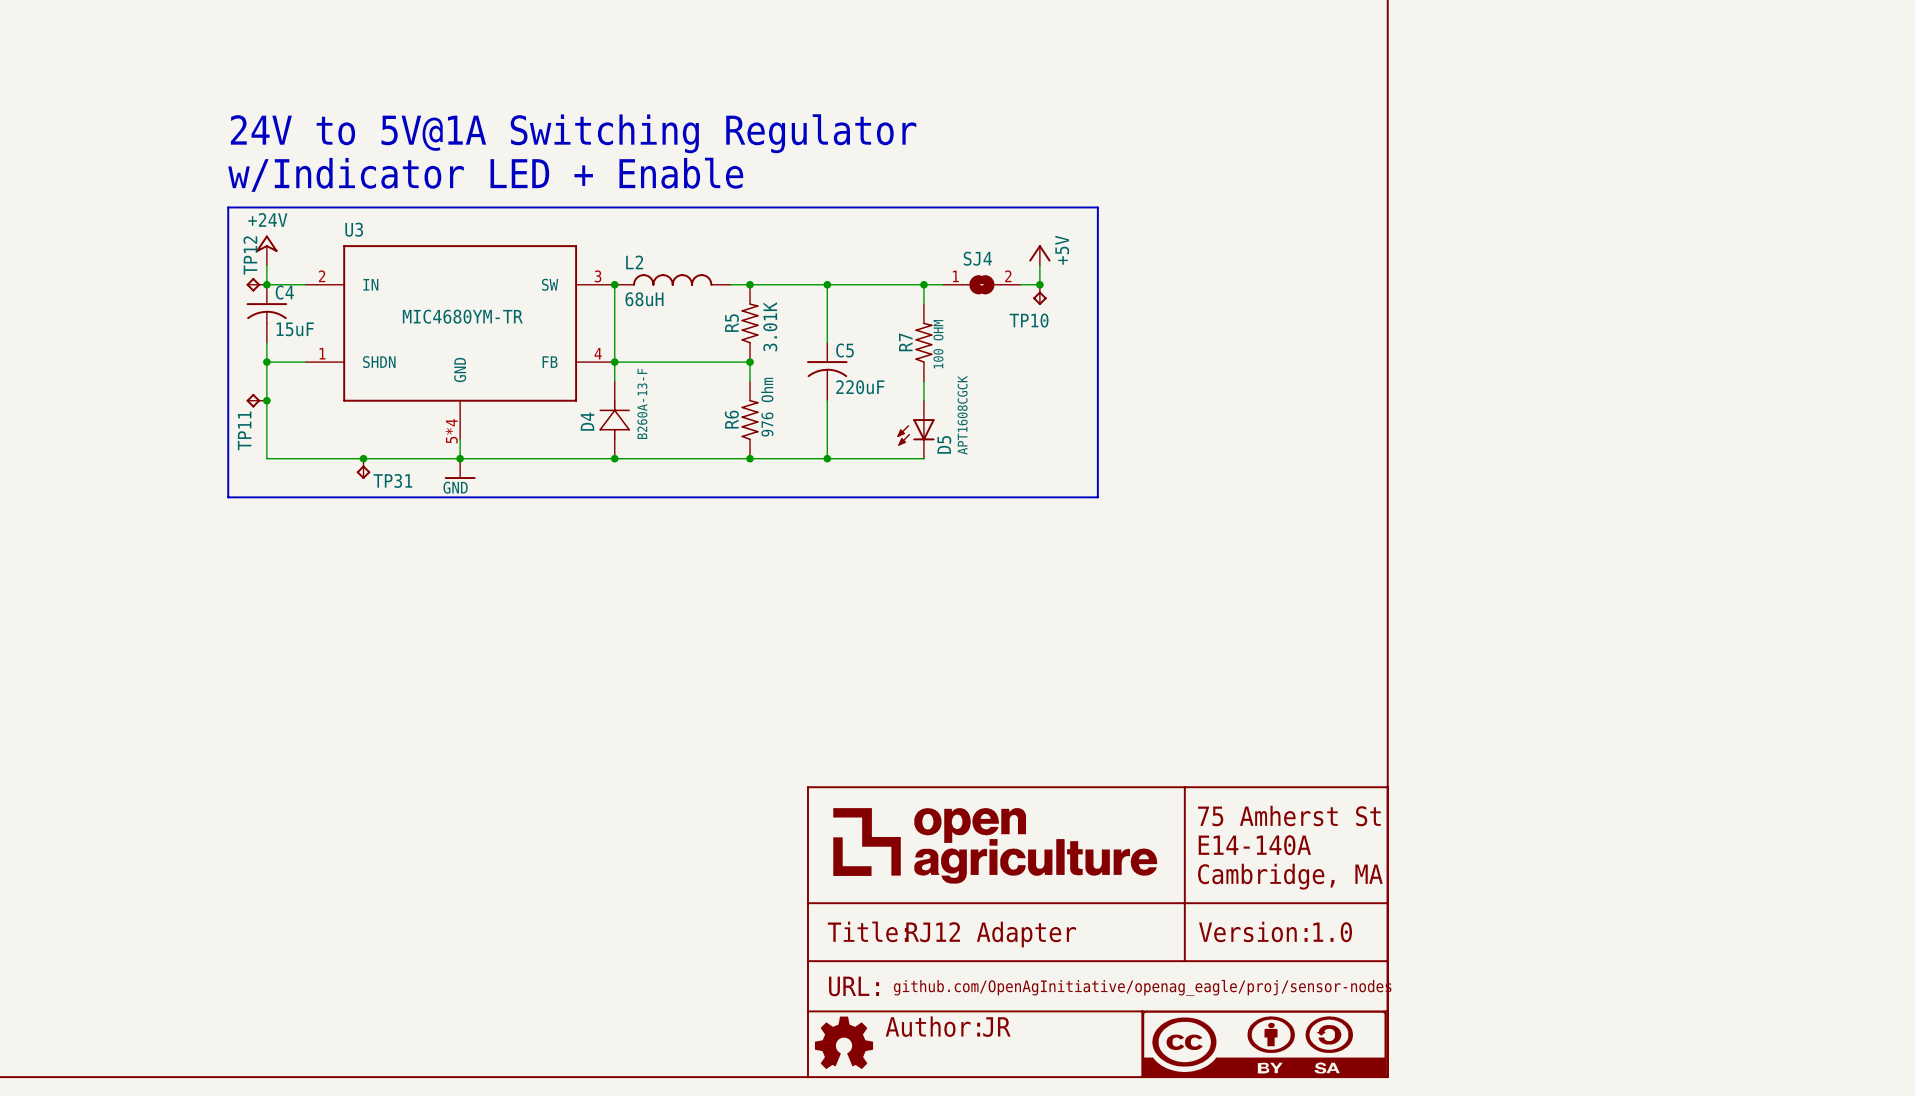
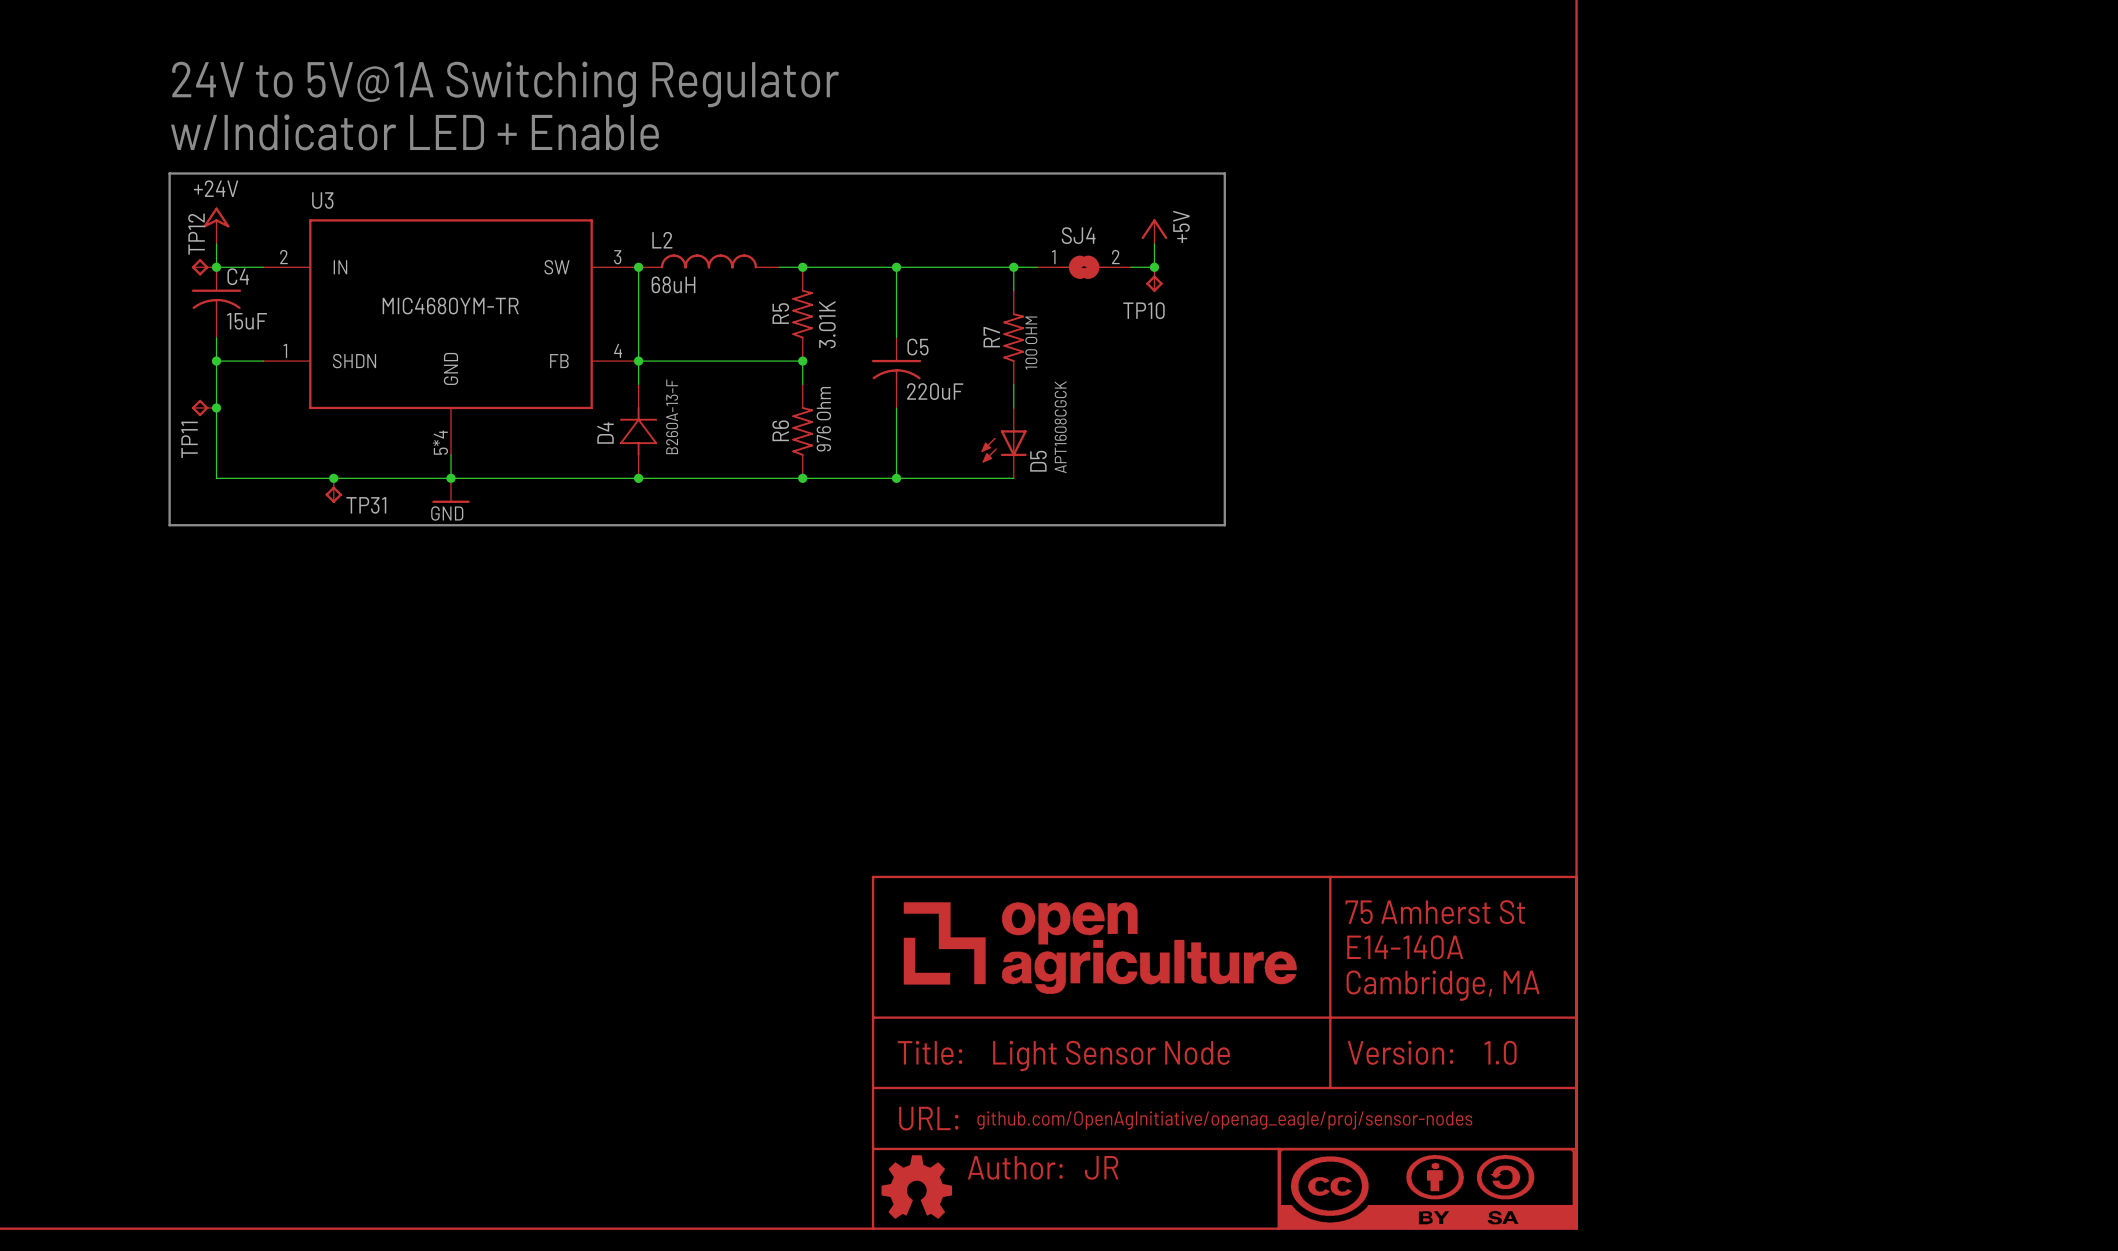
part text: RJ12 Adapter (991, 934) -> Light Sensor Node (1111, 1055)

